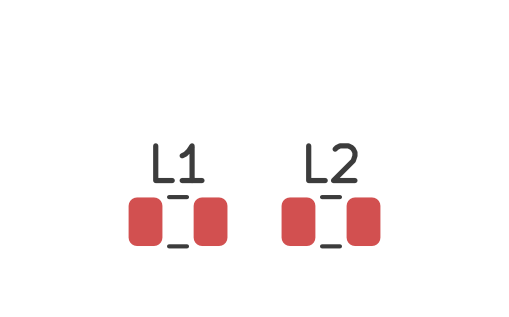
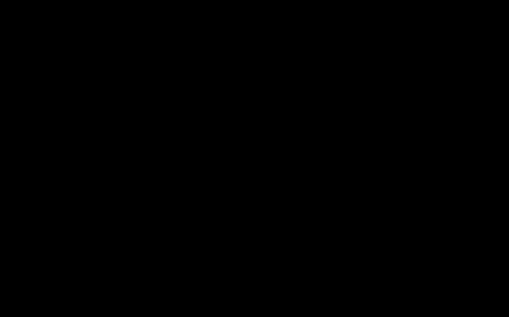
L1: (178, 221) -> none
L2: (330, 221) -> none

